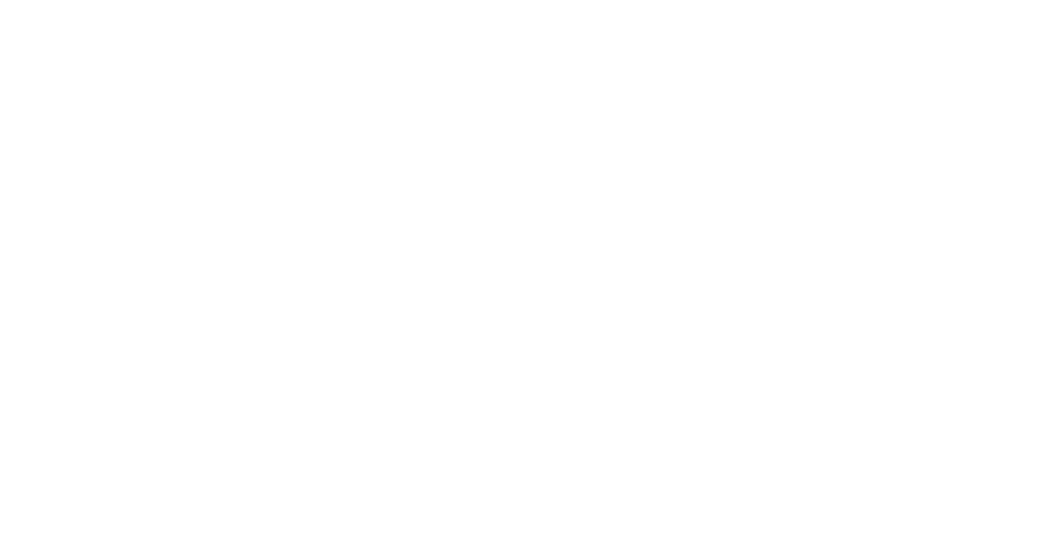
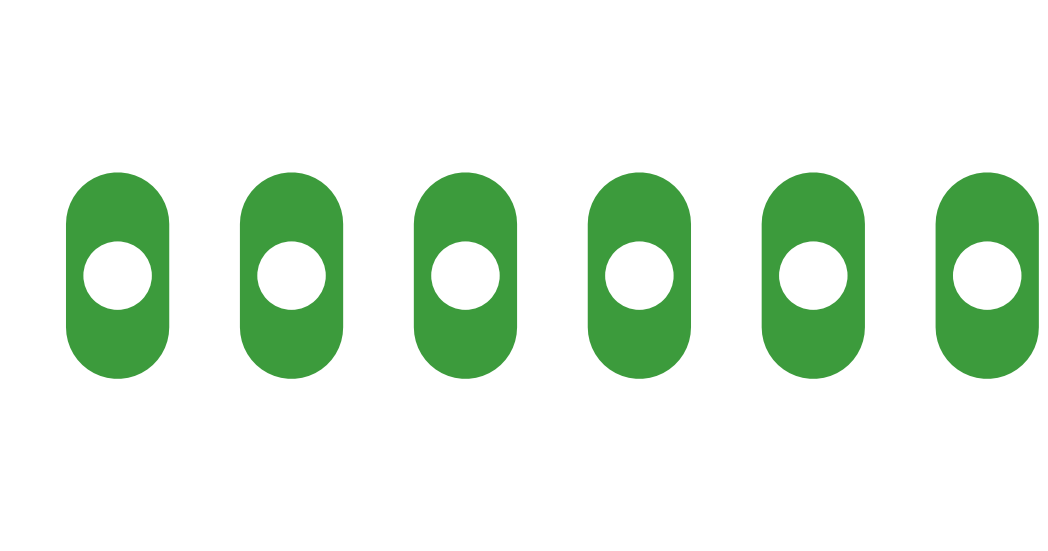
part: none -> (552, 275)

